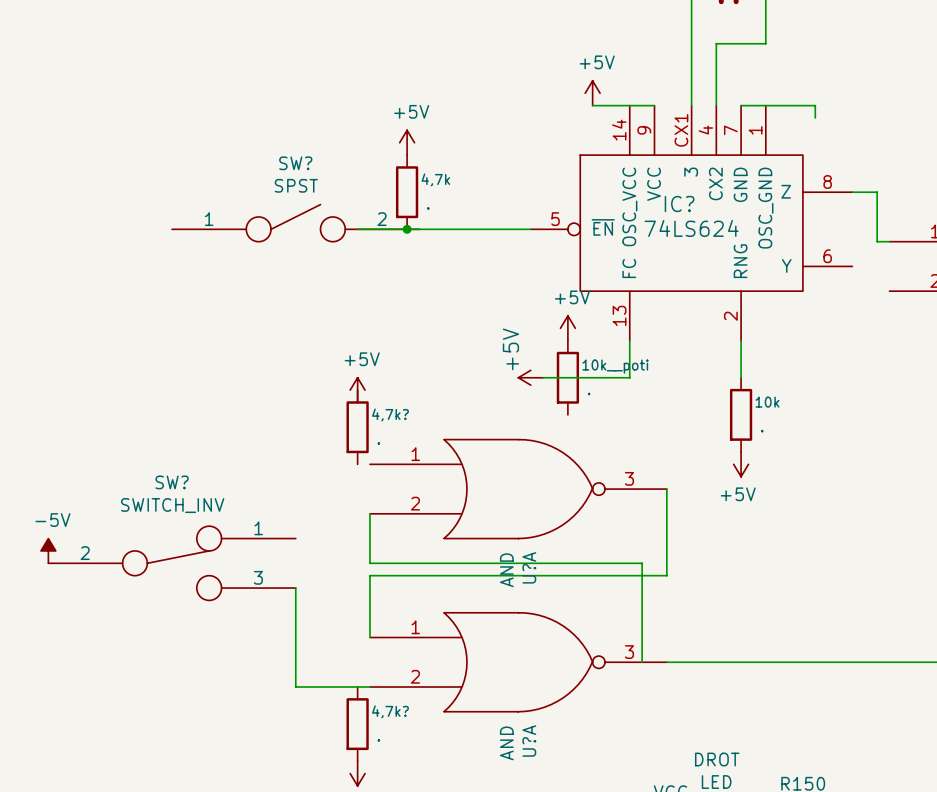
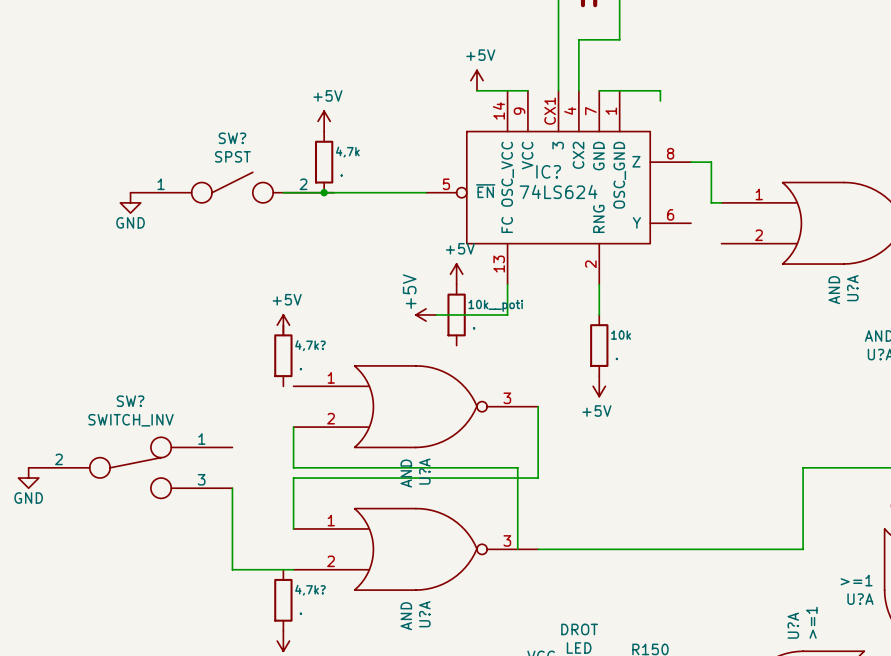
power symbol: none -> GND (130, 202)
power symbol: -5V (48, 550) -> none
power symbol: none -> GND (28, 478)

